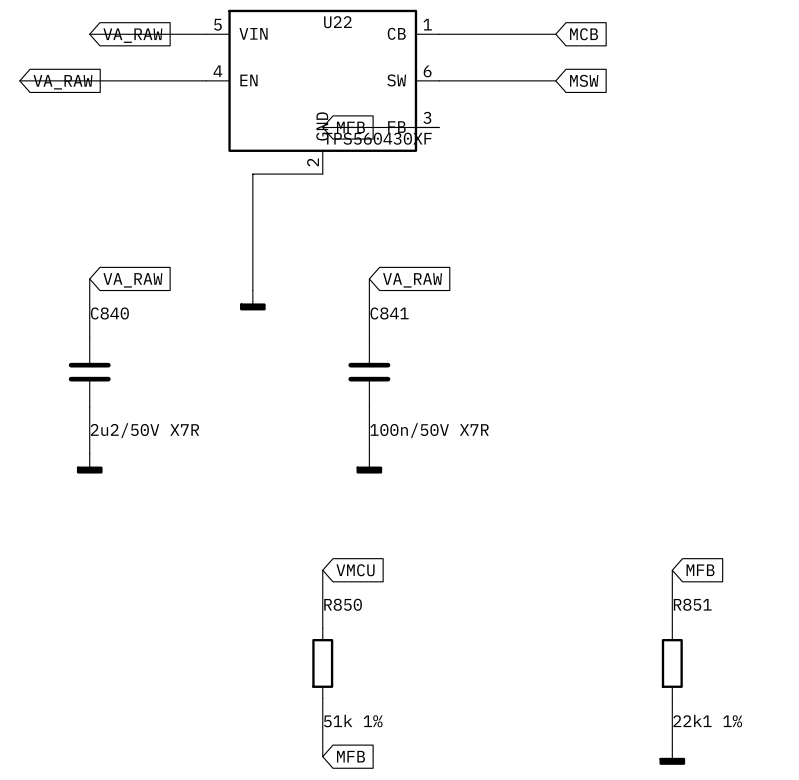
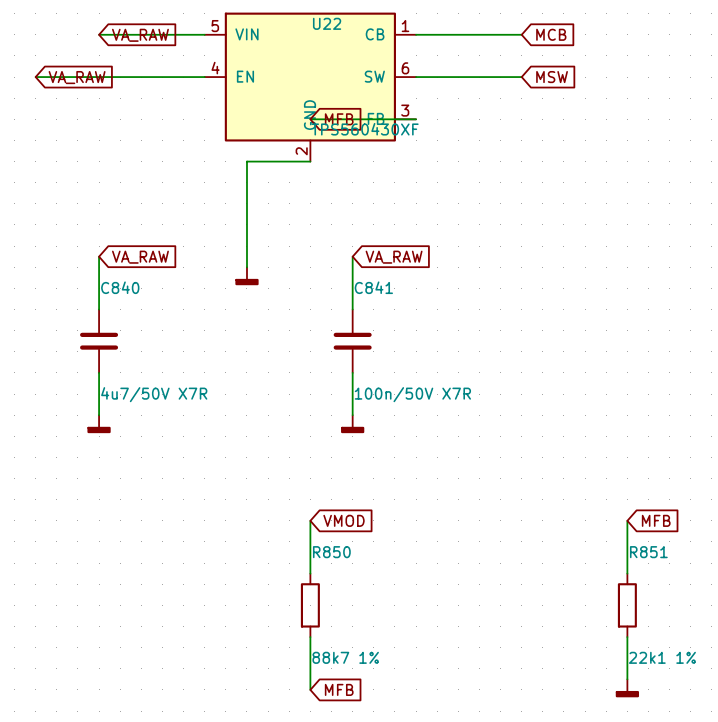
C840 value: 2u2/50V X7R (144, 430) -> 4u7/50V X7R (154, 394)
global label: VMCU (355, 570) -> VMOD (343, 520)
R850 value: 51k 1% (353, 721) -> 88k7 1% (345, 657)

